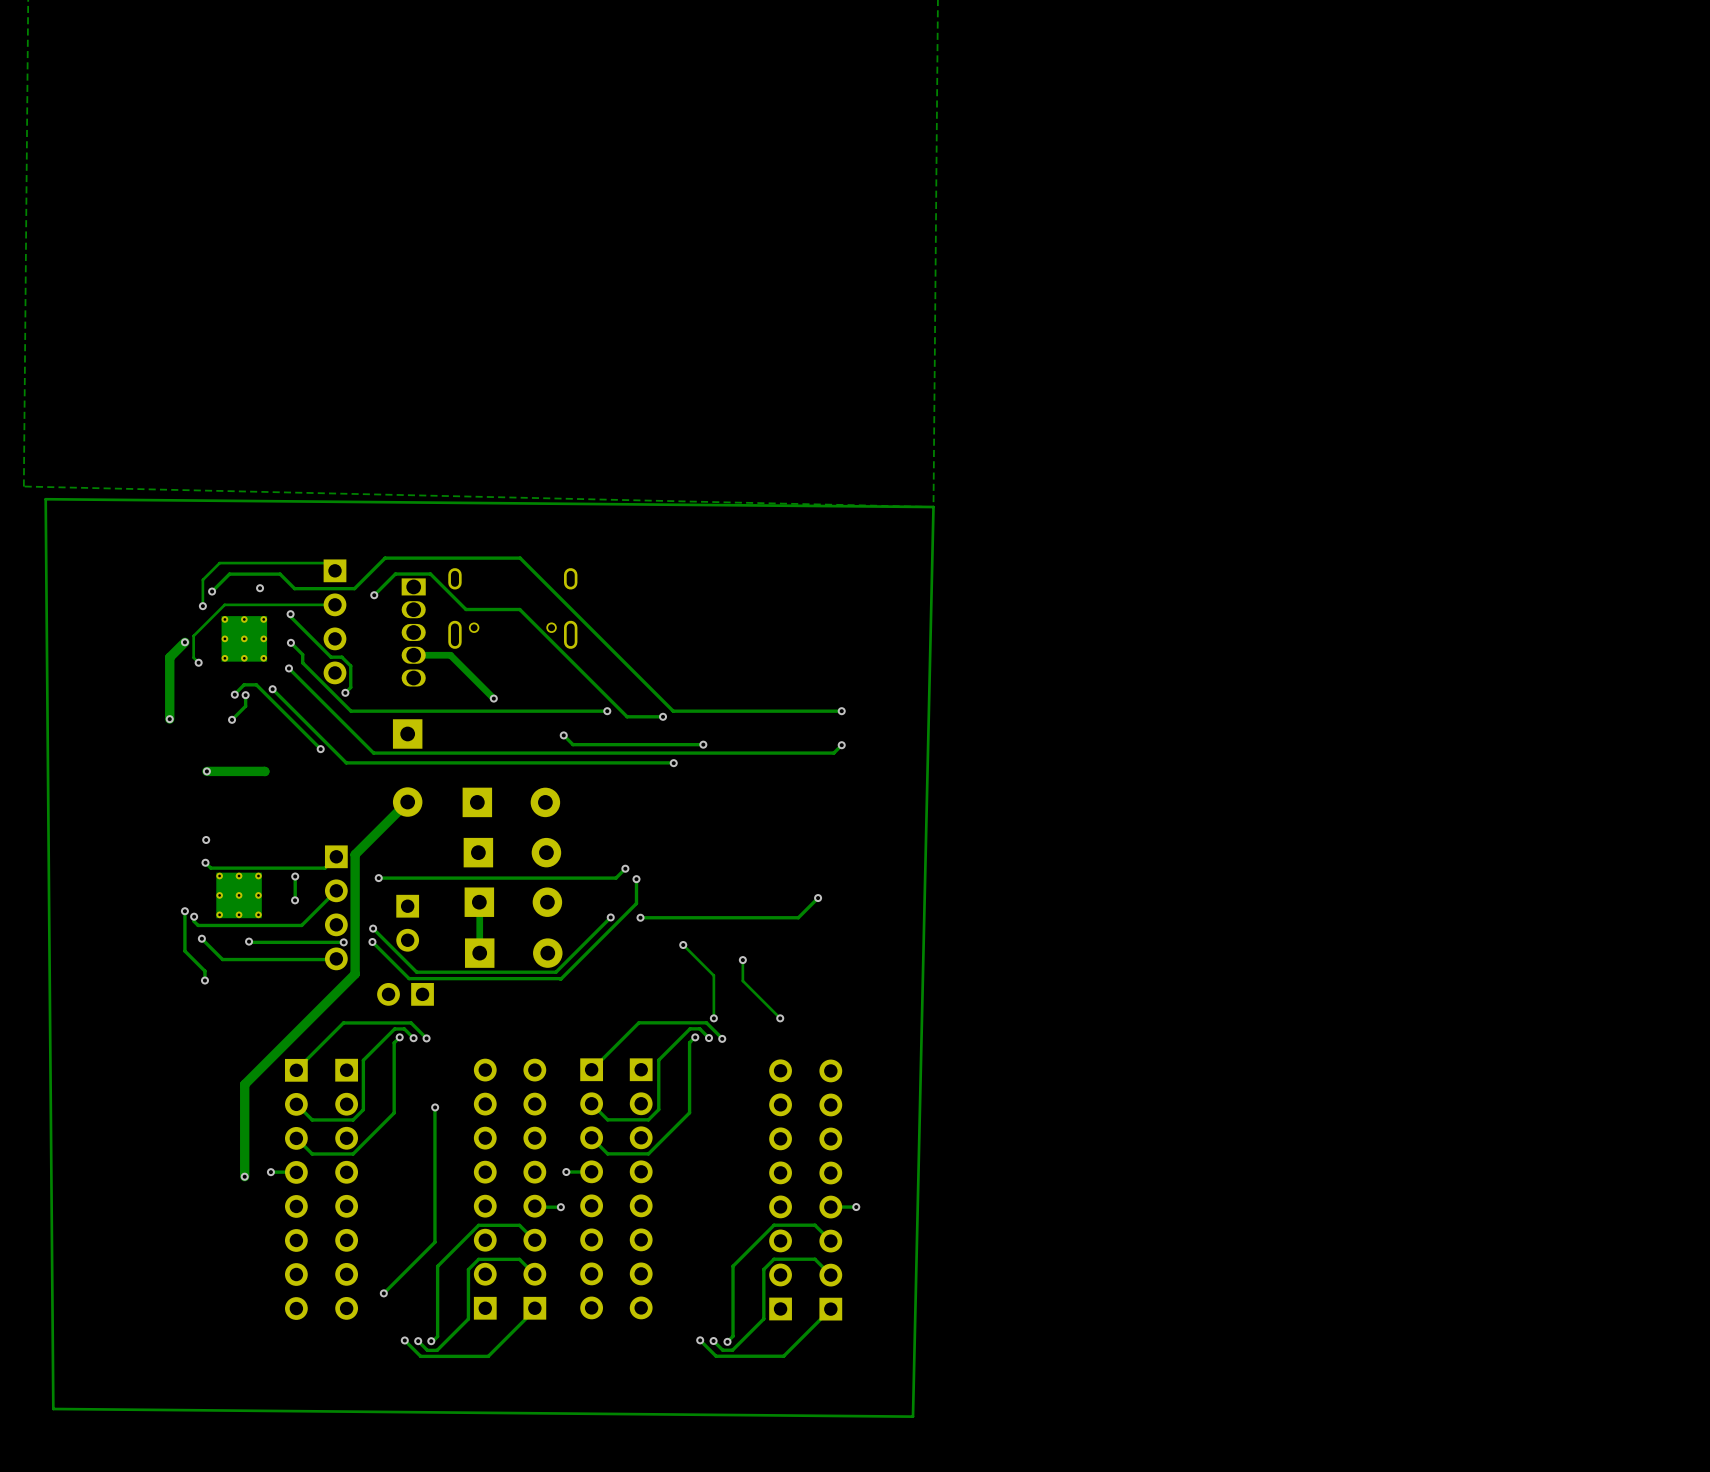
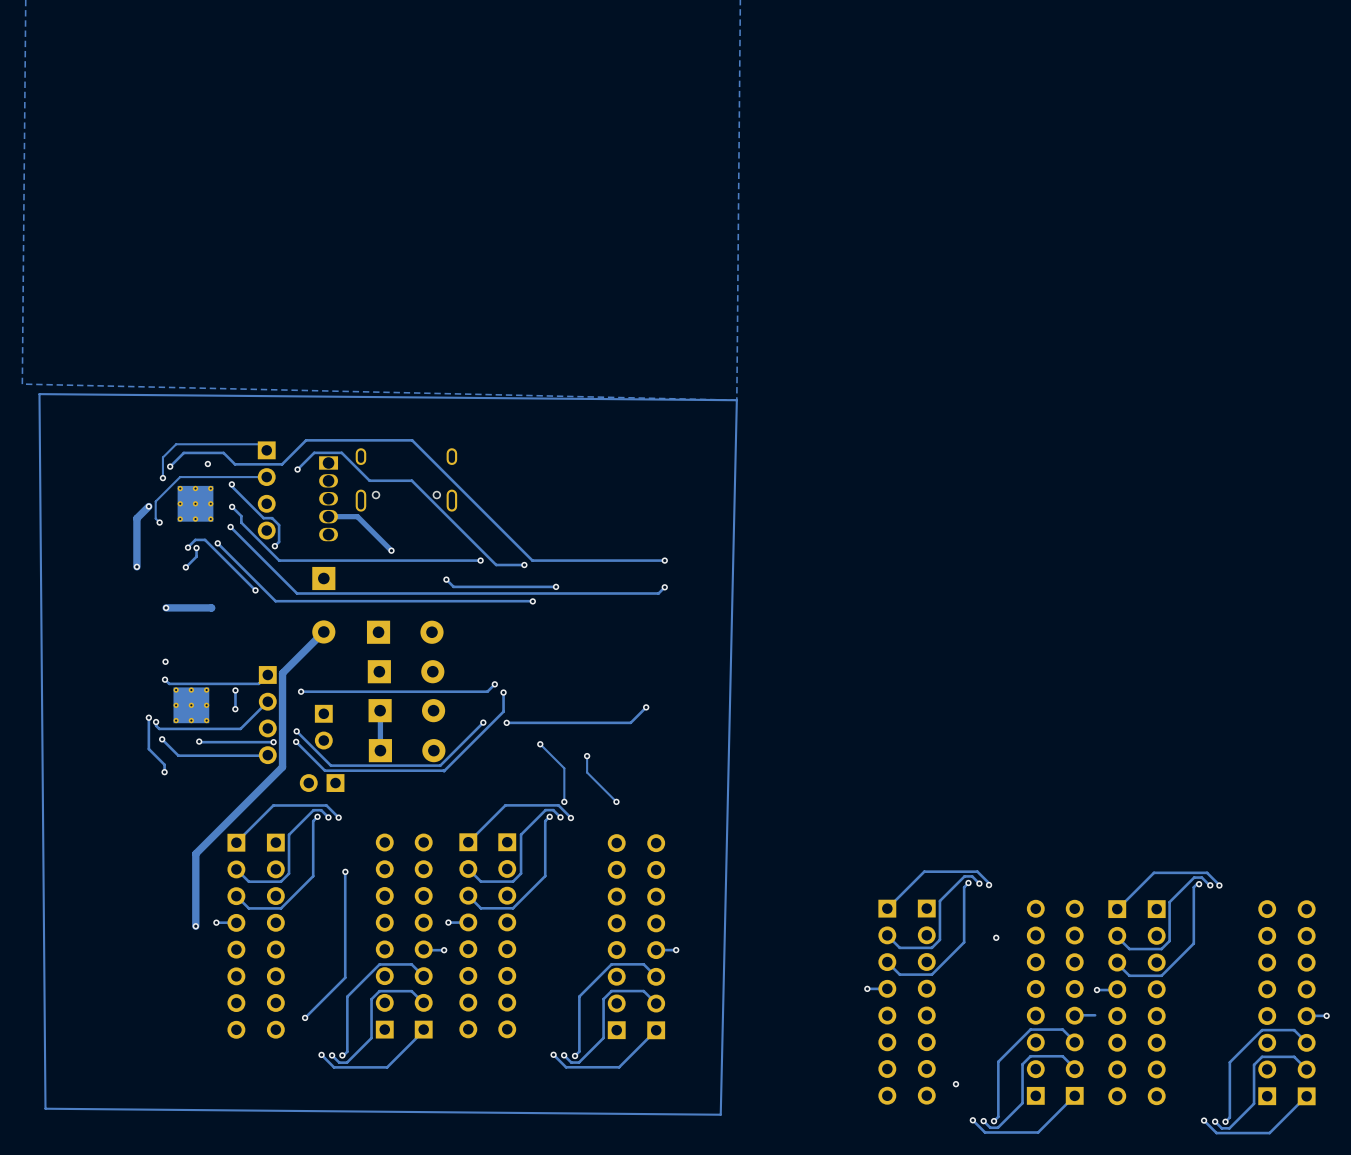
track: none -> (968, 882) (964, 887) (964, 942) (931, 974) (899, 974) (887, 962)
via: none -> (968, 882)
track: none -> (979, 883) (972, 876) (964, 876) (939, 901) (939, 939) (931, 947) (899, 947) (887, 935)
via: none -> (979, 883)
track: none -> (989, 884) (977, 871) (924, 871) (887, 908)
track: none -> (1199, 884) (1193, 887) (1193, 943) (1161, 975) (1129, 975) (1116, 963)
via: none -> (1199, 884)
track: none -> (1209, 884) (1201, 877) (1194, 877) (1169, 902) (1169, 941) (1161, 949) (1129, 949) (1116, 936)
via: none -> (989, 885)
via: none -> (1210, 885)
via: none -> (1219, 885)
track: none -> (1219, 885) (1207, 872) (1154, 872) (1116, 909)
via: none -> (996, 937)
via: none -> (867, 988)
track: none -> (887, 988) (867, 988)
via: none -> (1097, 990)
track: none -> (1116, 990) (1097, 990)
part: none -> (887, 1002)
part: none -> (926, 1002)
part: none -> (1035, 1002)
part: none -> (1074, 1002)
part: none -> (1117, 1002)
part: none -> (1156, 1002)
part: none -> (1267, 1002)
part: none -> (1306, 1002)
track: none -> (1095, 1015) (1075, 1015)
track: none -> (1326, 1015) (1306, 1015)
via: none -> (1326, 1015)
track: none -> (1075, 1042) (1062, 1029) (1030, 1029) (998, 1061) (998, 1116) (994, 1121)
track: none -> (1306, 1042) (1294, 1030) (1262, 1030) (1229, 1062) (1229, 1117) (1225, 1121)
track: none -> (1075, 1068) (1062, 1056) (1030, 1056) (1022, 1064) (1022, 1103) (997, 1127) (990, 1127) (983, 1120)
track: none -> (1306, 1069) (1294, 1056) (1262, 1056) (1254, 1064) (1254, 1103) (1229, 1128) (1221, 1128) (1214, 1121)
via: none -> (955, 1084)
track: none -> (1075, 1095) (1038, 1132) (985, 1132) (972, 1120)
track: none -> (1306, 1096) (1269, 1133) (1216, 1133) (1204, 1120)
via: none -> (972, 1120)
via: none -> (983, 1121)
via: none -> (994, 1121)
via: none -> (1204, 1120)
via: none -> (1215, 1121)
via: none -> (1225, 1121)

